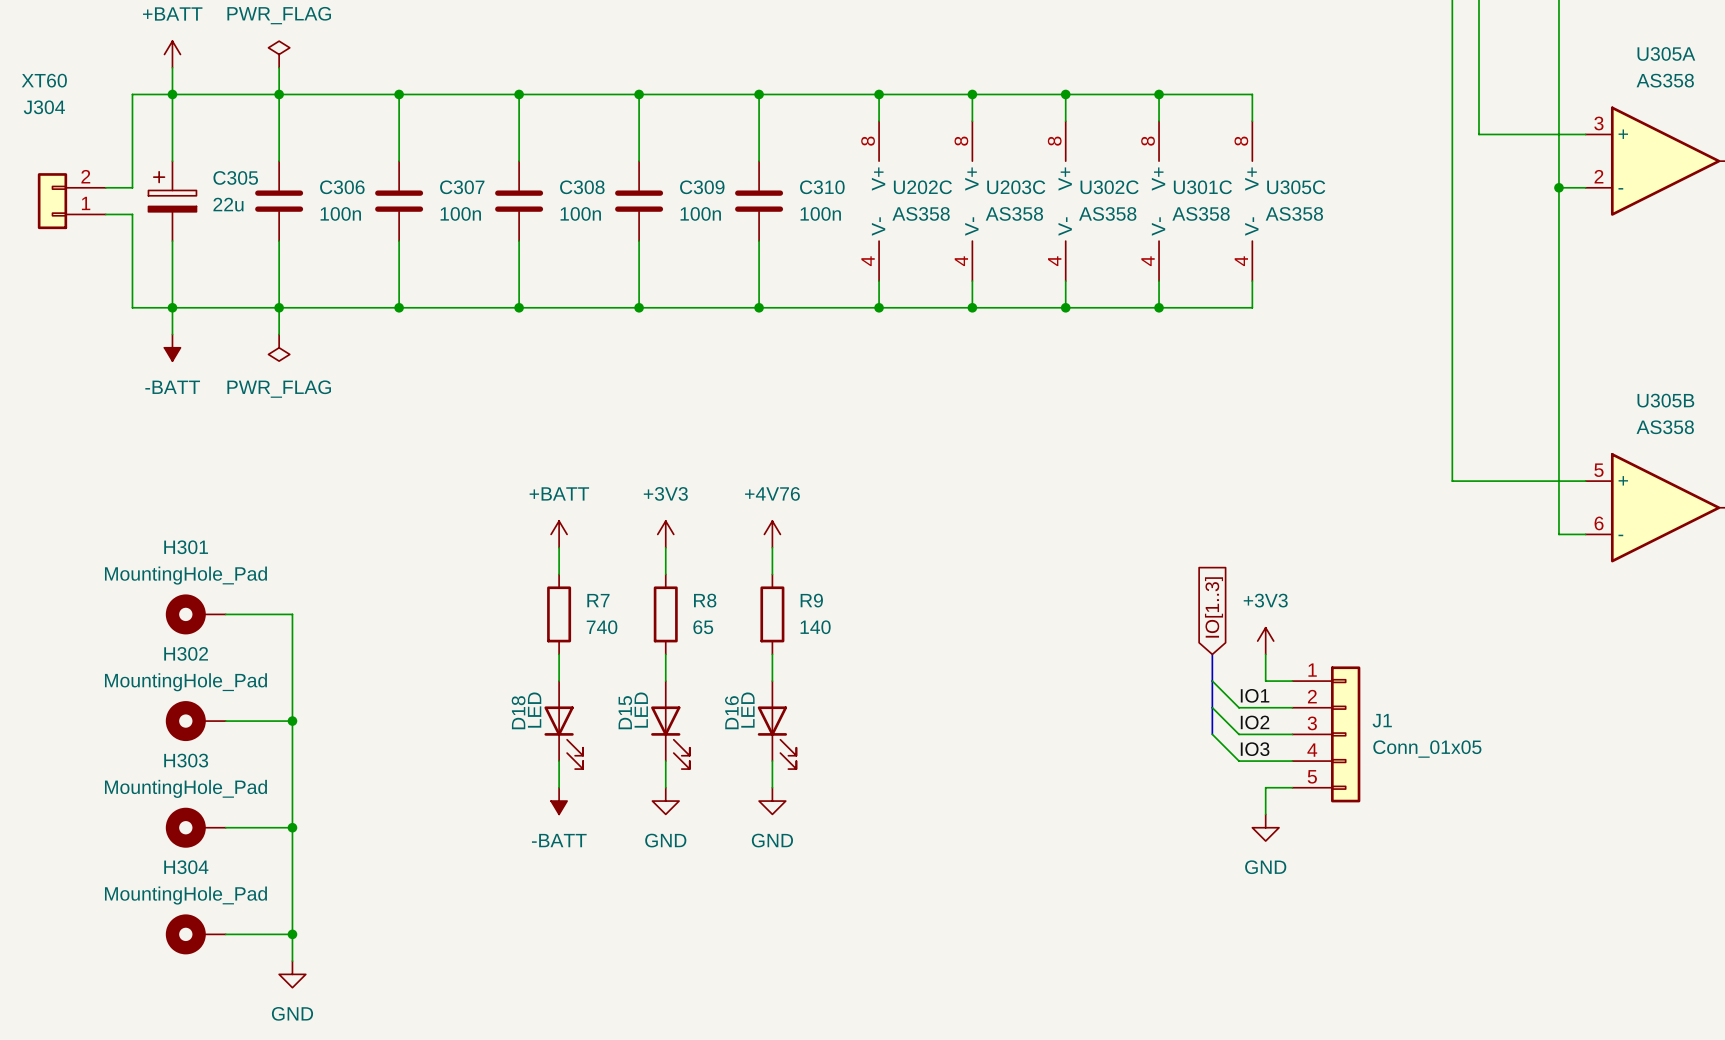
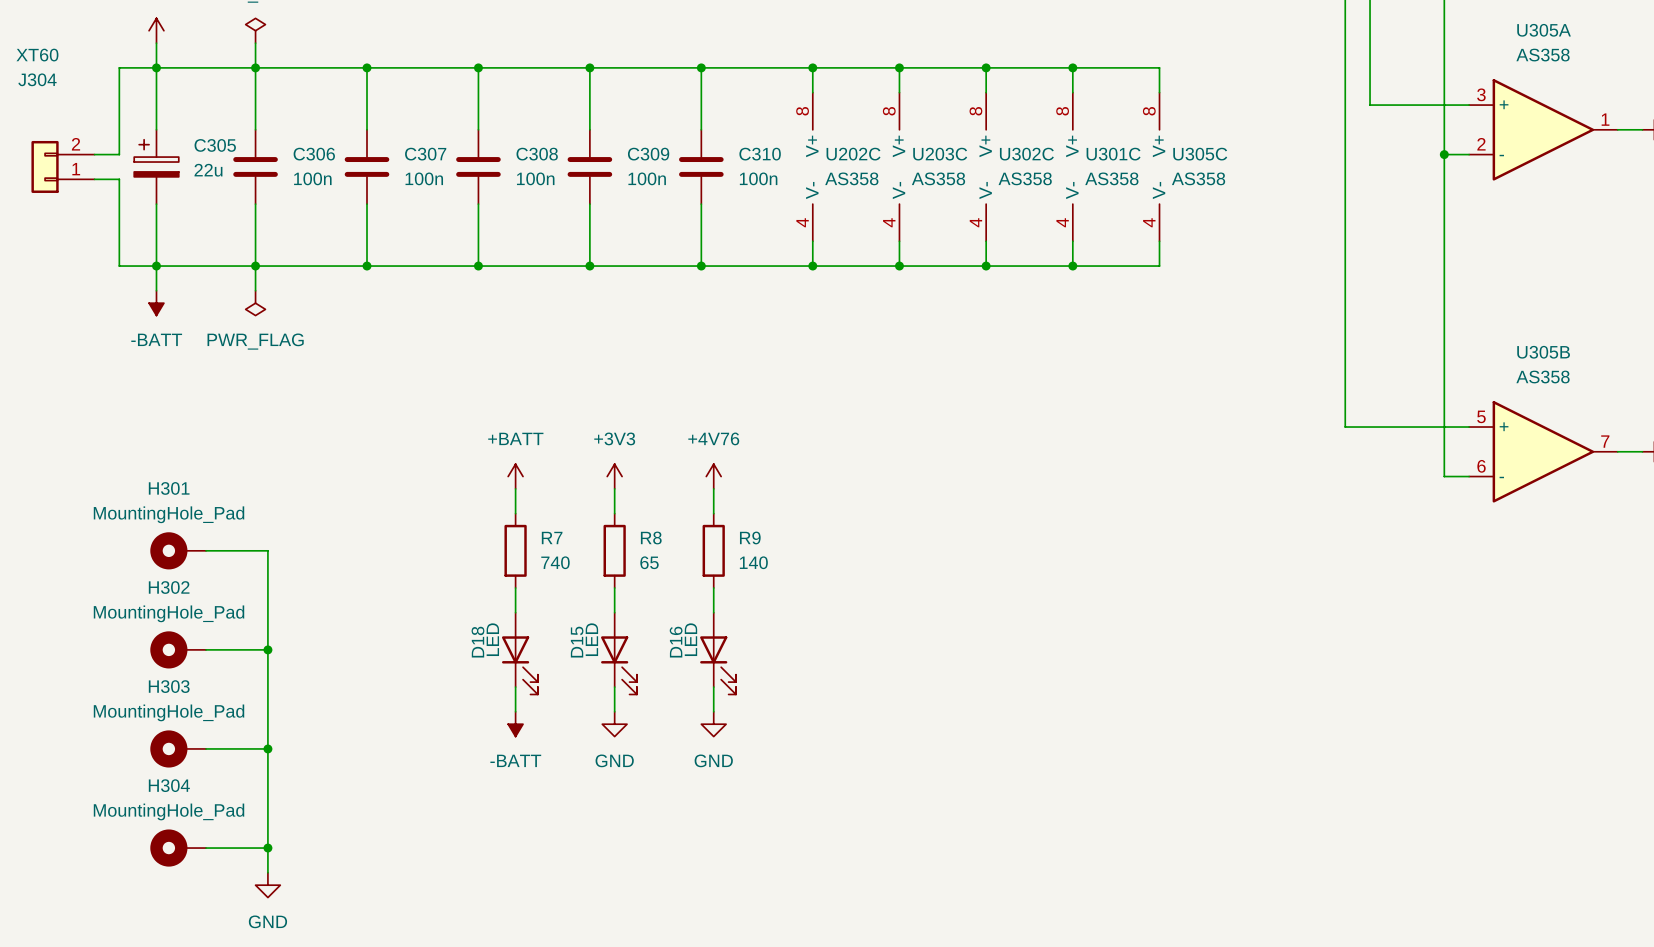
global label: IO[1..3] (1214, 607) -> none
power symbol: +3V3 (1265, 641) -> none
bus: (1212, 654) (1212, 734) -> none
wire: (1265, 654) (1265, 681) (1292, 681) -> none
wire: (1212, 681) (1239, 707) (1292, 707) -> none
label: IO1 (1255, 695) -> none
wire: (1212, 707) (1239, 734) (1292, 734) -> none
label: IO2 (1255, 722) -> none
wire: (1212, 734) (1239, 761) (1292, 761) -> none
J1: Conn_01x05 (1326, 734) -> none
label: IO3 (1255, 749) -> none
wire: (1292, 787) (1265, 787) (1265, 814) -> none
power symbol: GND (1265, 827) -> none

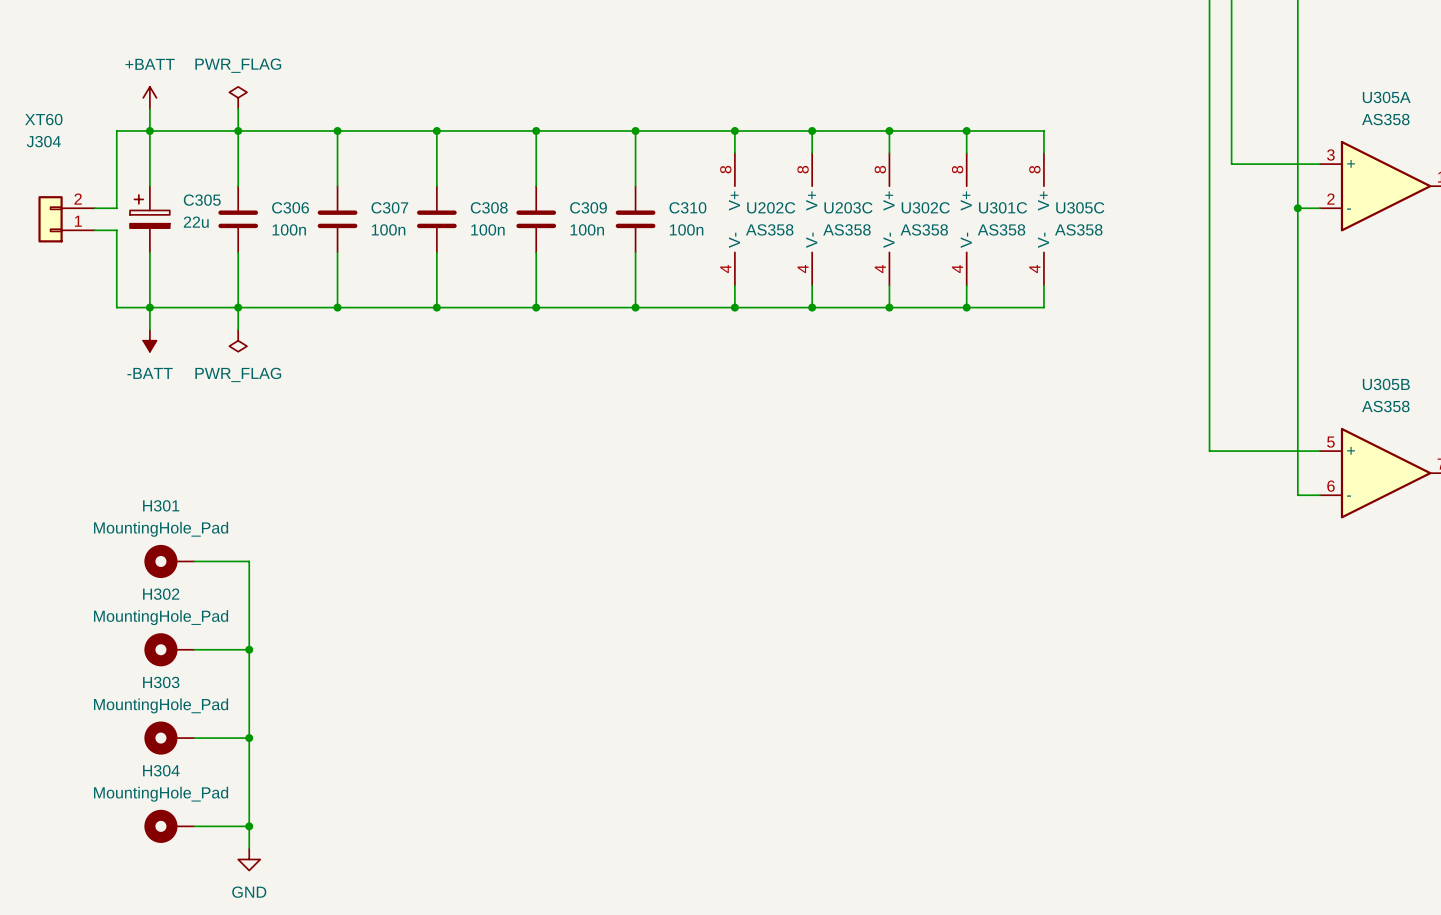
power symbol: +BATT (515, 476) -> none
power symbol: +3V3 (614, 476) -> none
power symbol: +4V76 (713, 476) -> none
wire: (515, 488) (515, 513) -> none
wire: (614, 488) (614, 513) -> none
wire: (713, 488) (713, 513) -> none
R7: 740 (515, 550) -> none
R8: 65 (614, 550) -> none
R9: 140 (713, 550) -> none
wire: (515, 587) (515, 612) -> none
wire: (614, 587) (614, 612) -> none
wire: (713, 587) (713, 612) -> none
D18: LED (519, 653) -> none
D15: LED (618, 653) -> none
D16: LED (718, 653) -> none
wire: (515, 687) (515, 711) -> none
wire: (614, 687) (614, 711) -> none
wire: (713, 687) (713, 711) -> none
power symbol: -BATT (515, 724) -> none
power symbol: GND (614, 724) -> none
power symbol: GND (713, 724) -> none

